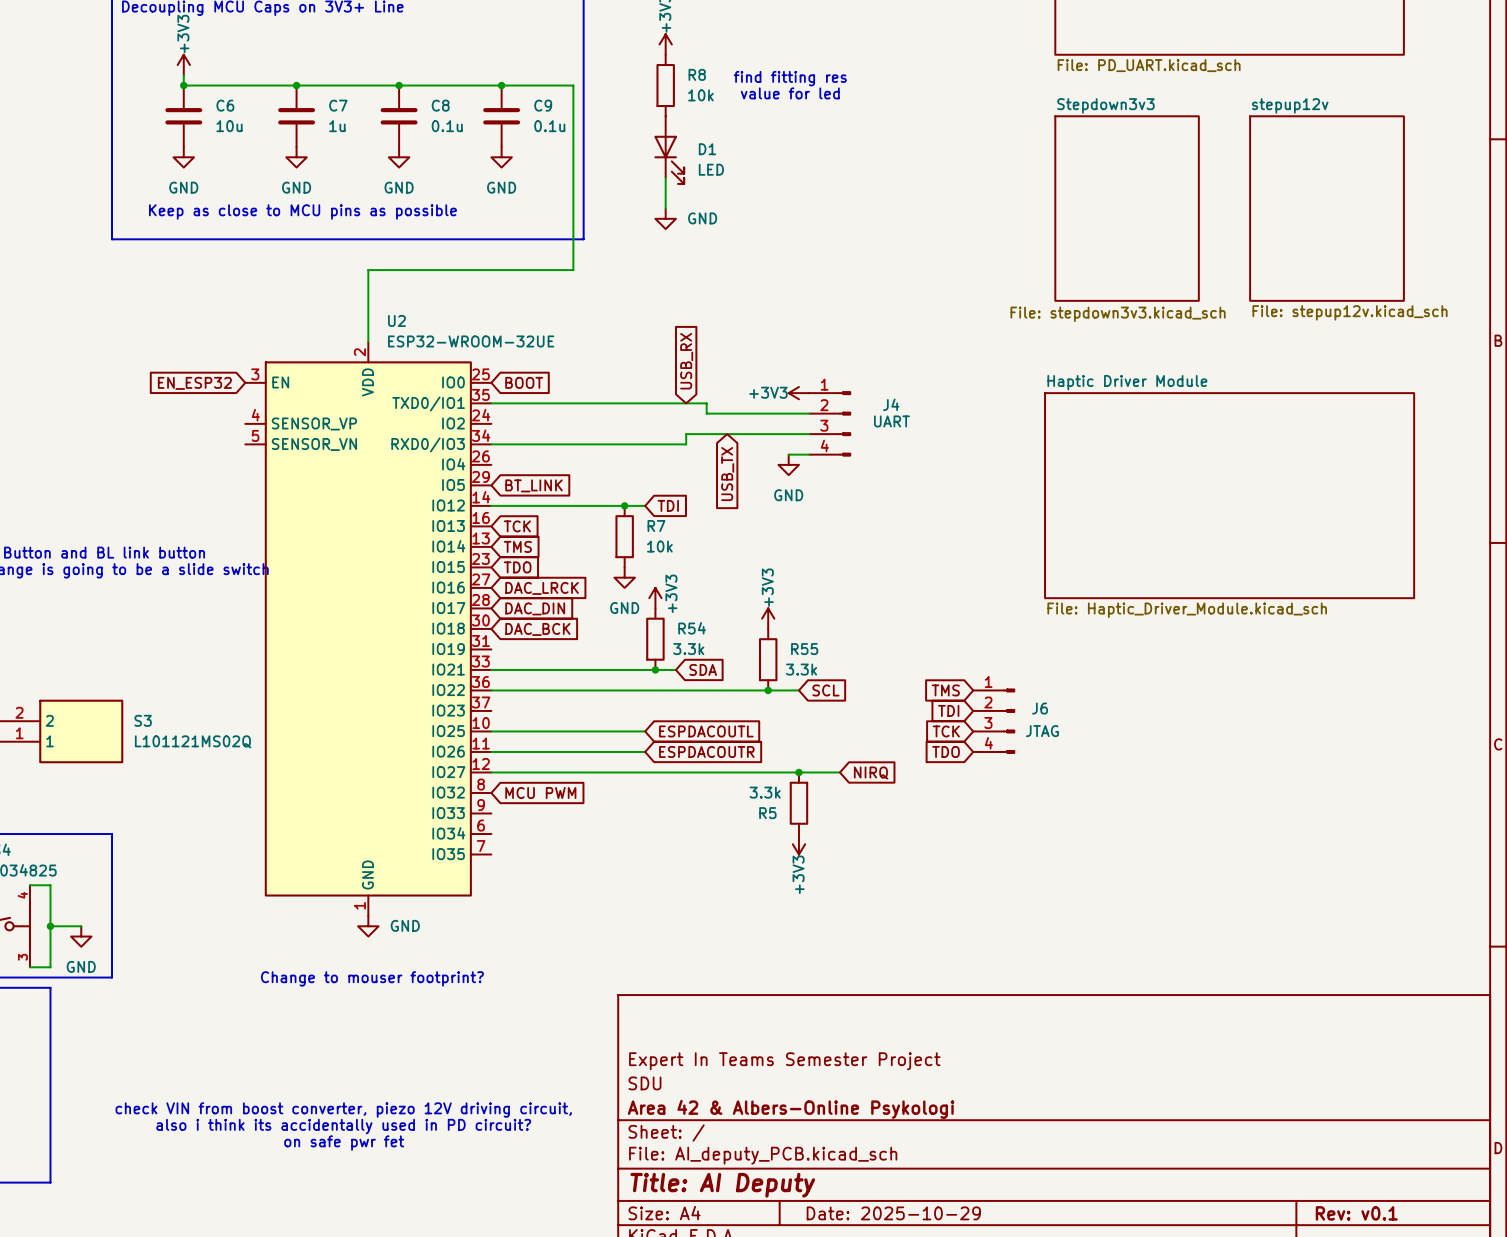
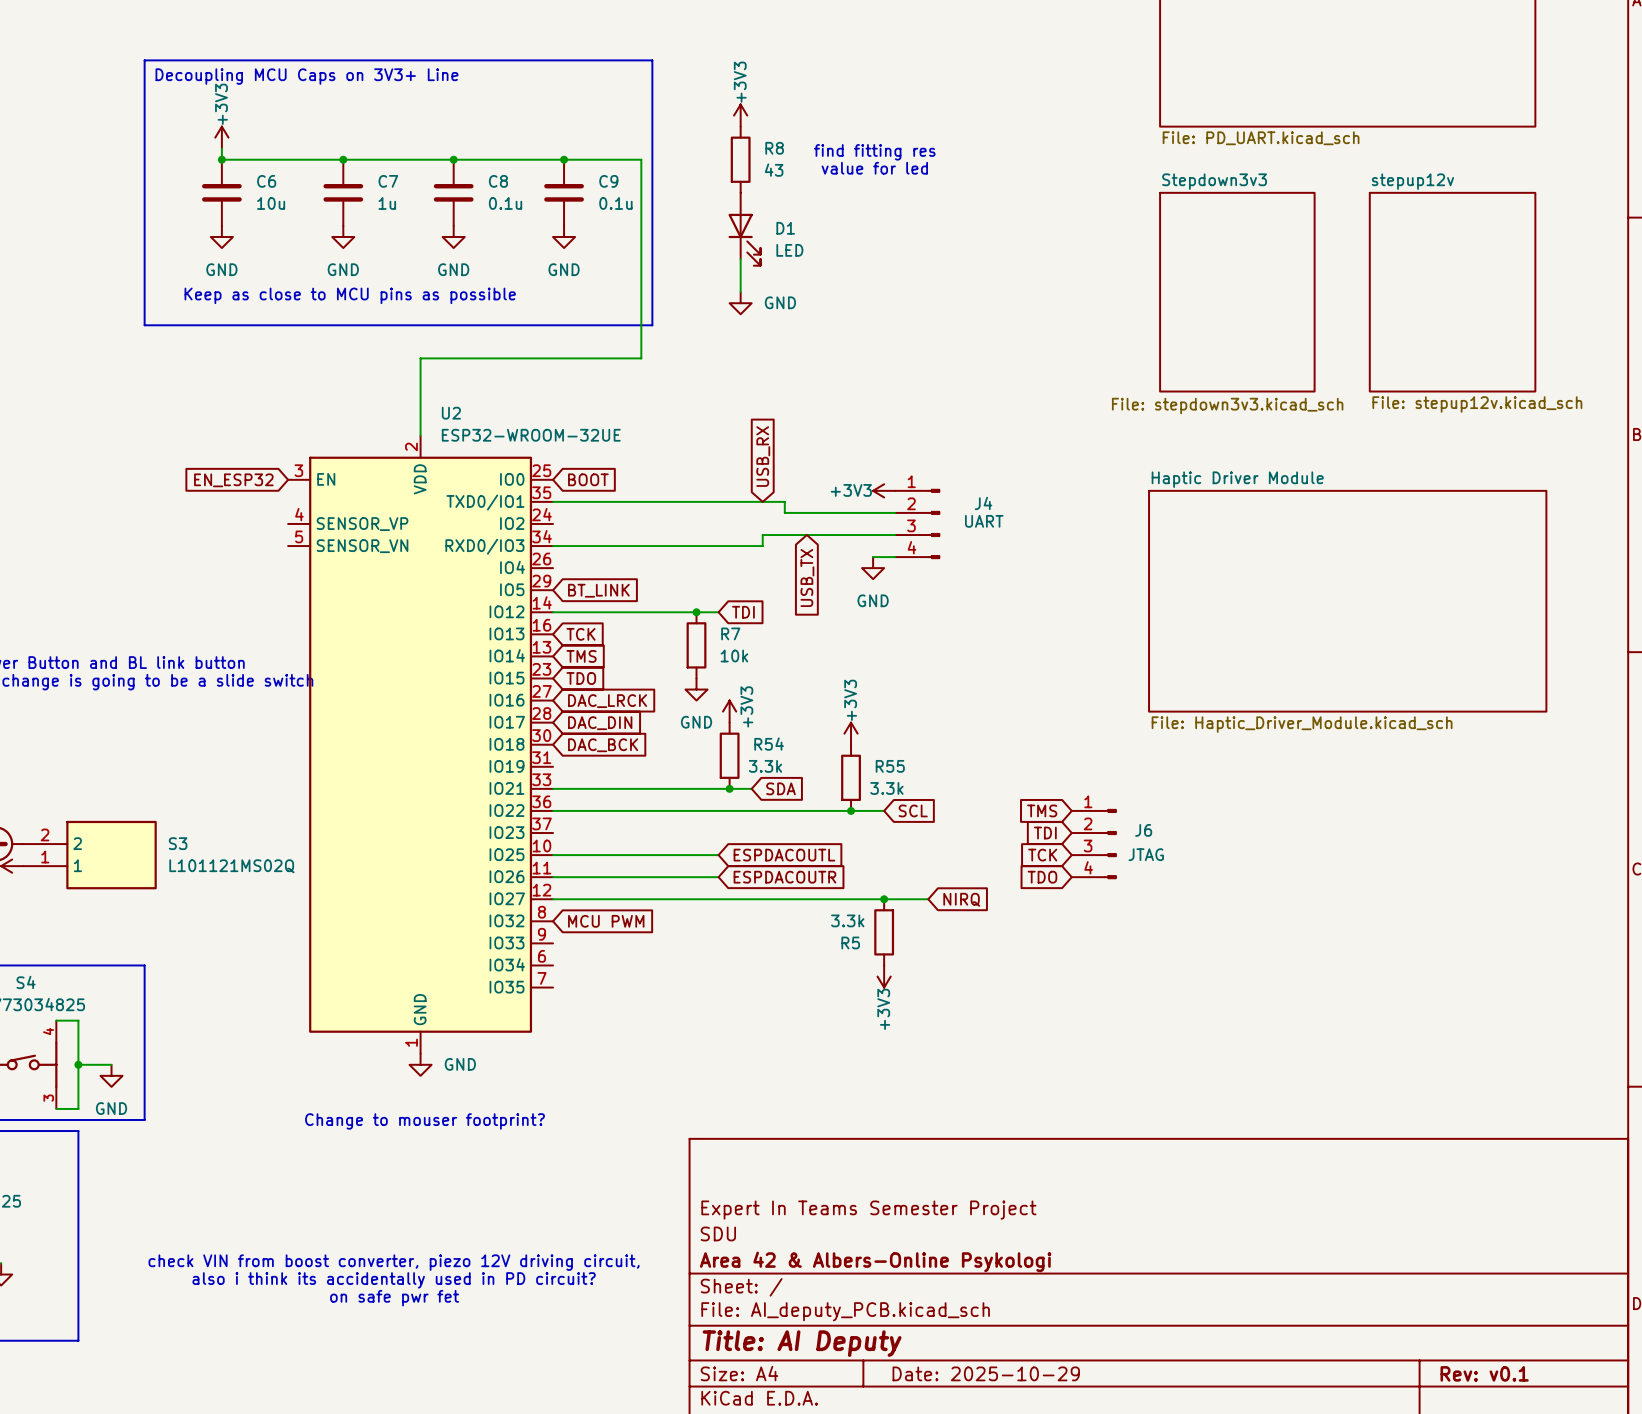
R8 value: 10k (700, 95) -> 43 (774, 170)

